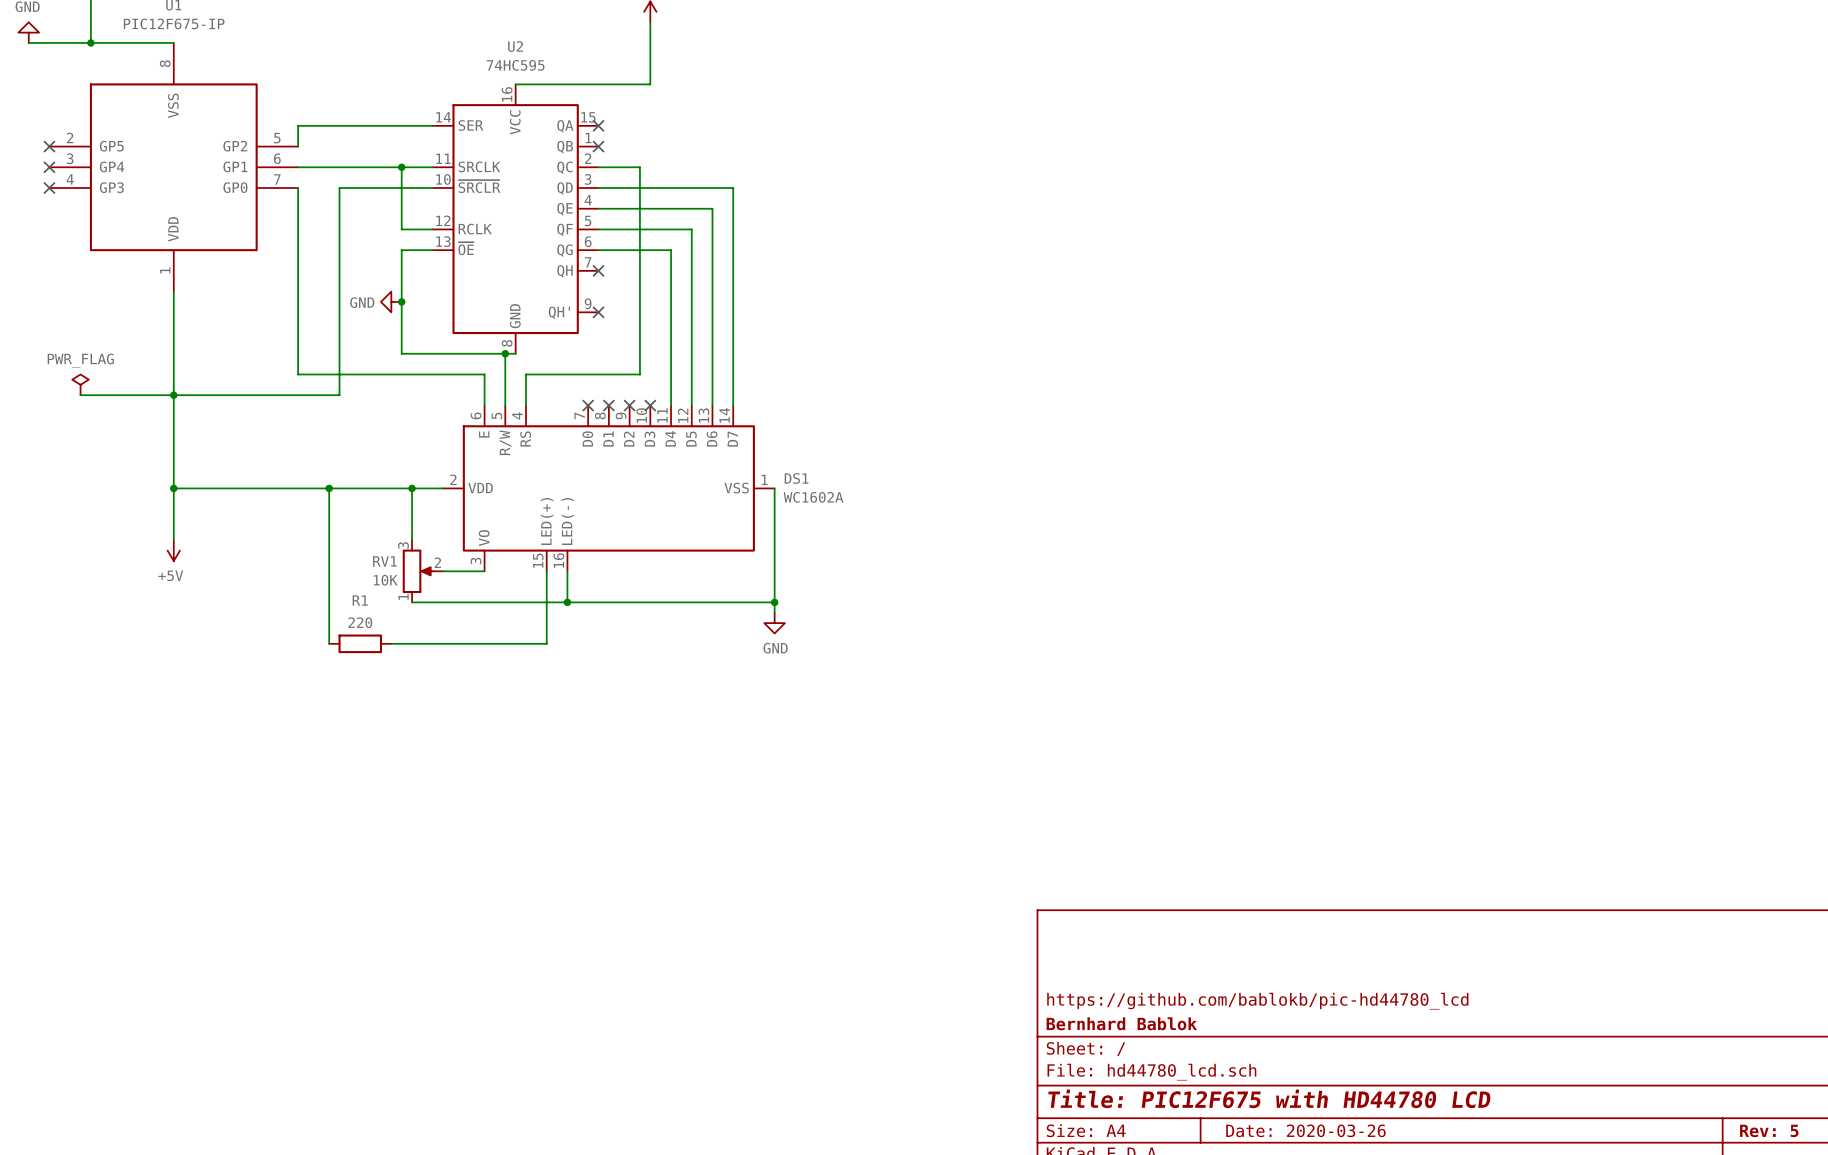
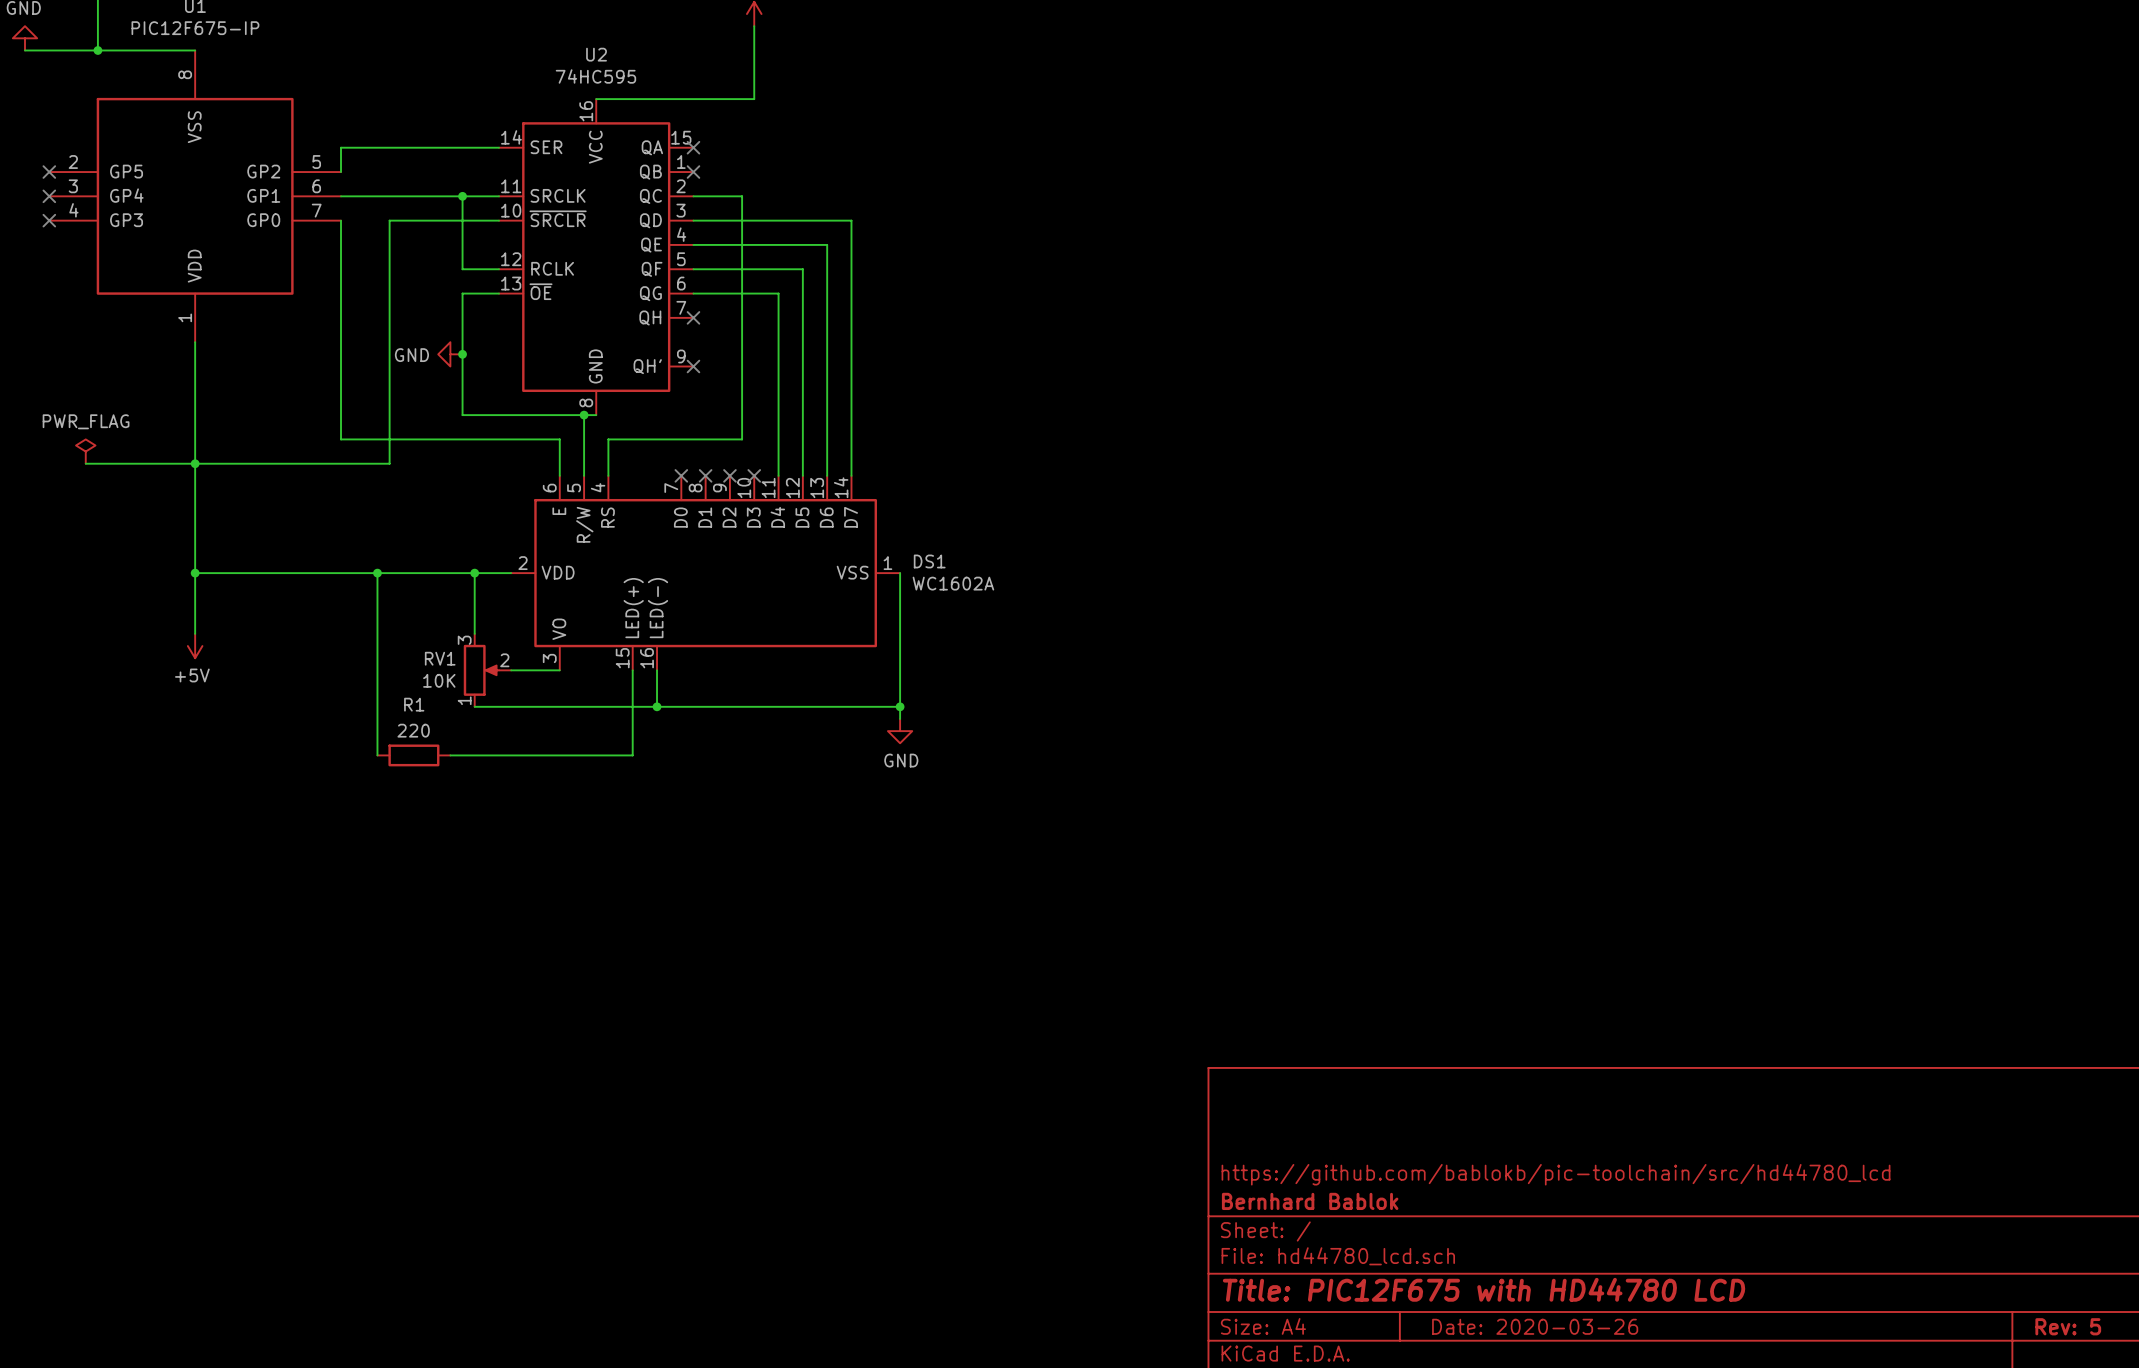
title block: https://github.com/bablokb/pic-hd44780_lcd (1257, 1001) -> https://github.com/bablokb/pic-toolchain/src/hd44780_lcd (1556, 1174)

